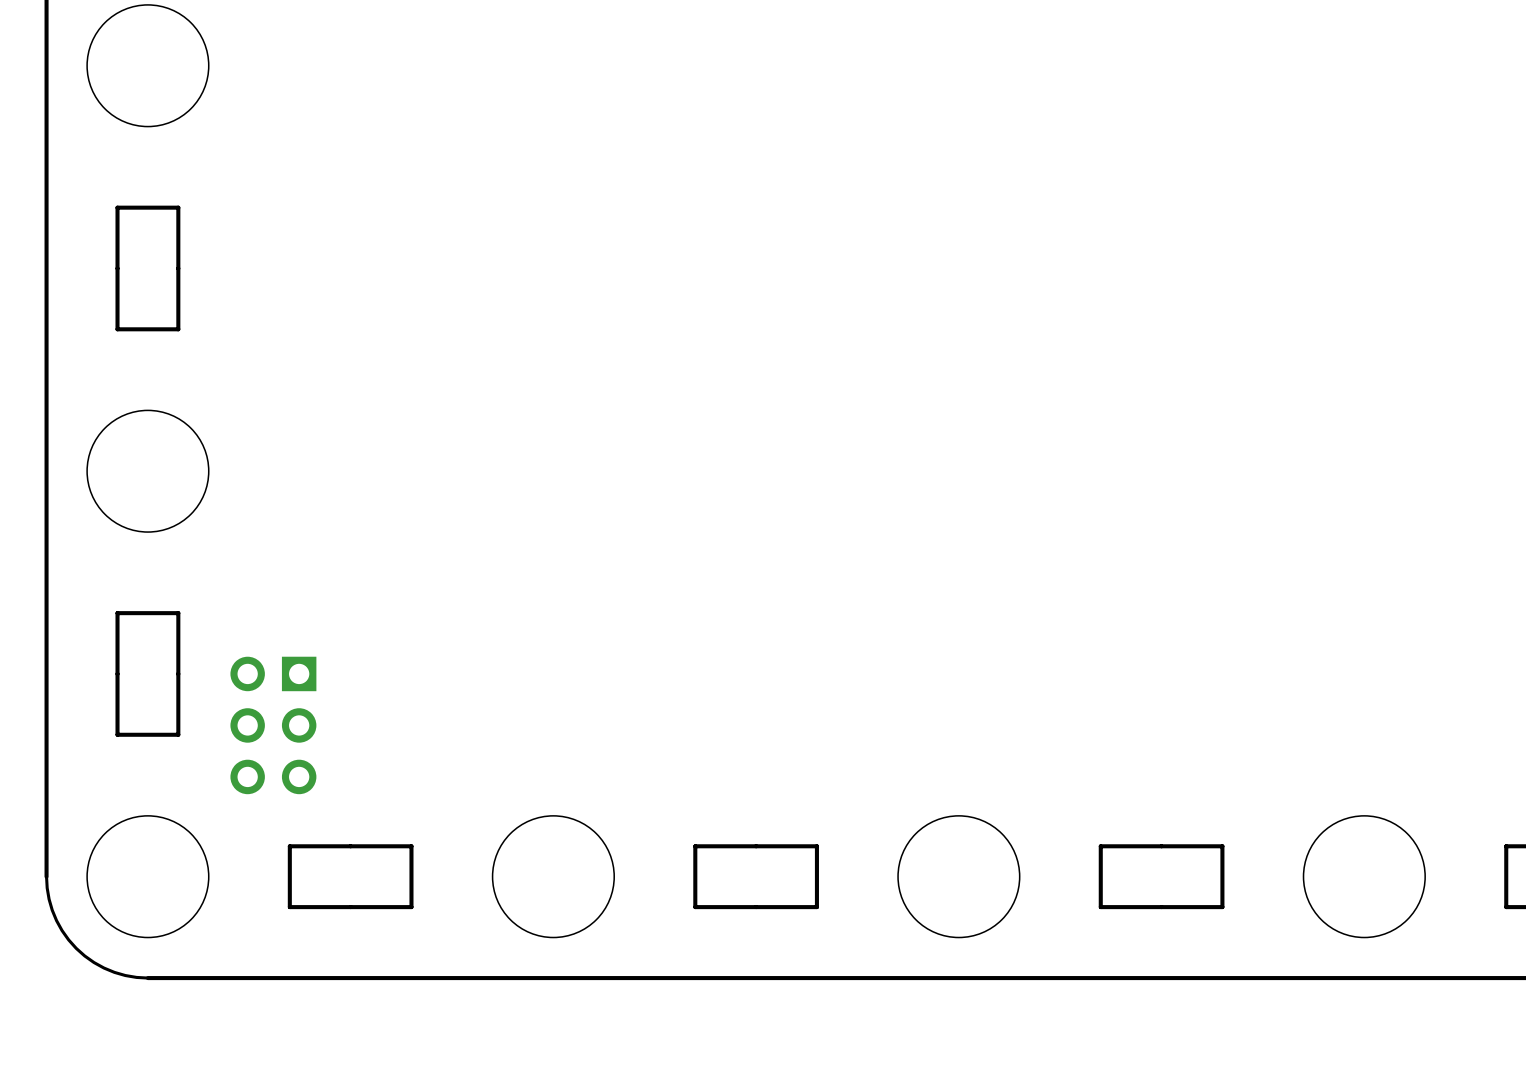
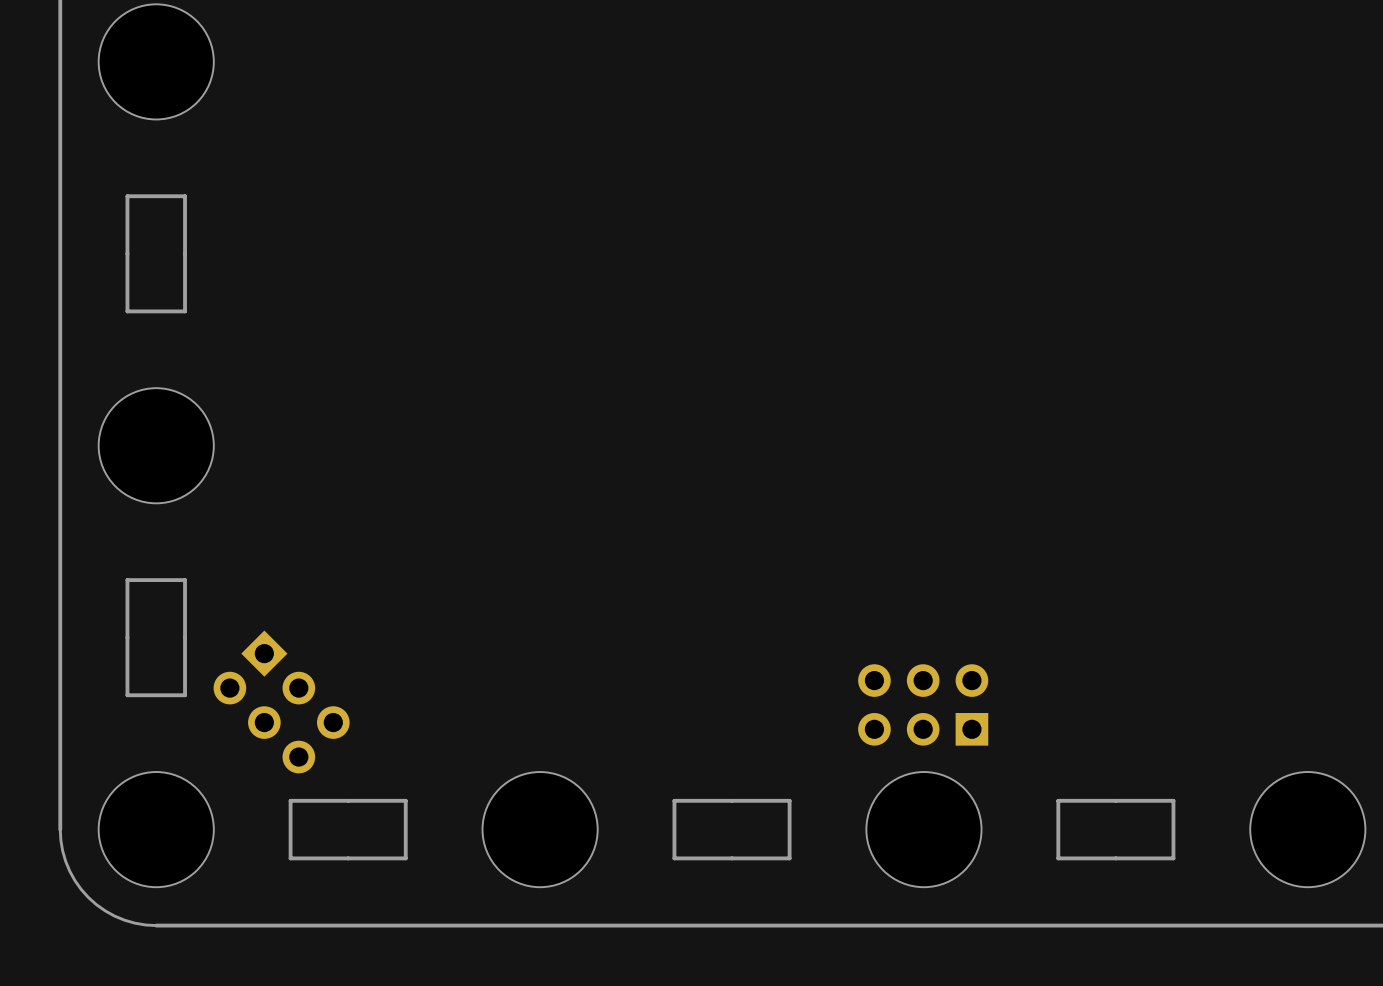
part rotation: 0° (273, 725) -> 45° counterclockwise (281, 701)
part: none -> (923, 704)

